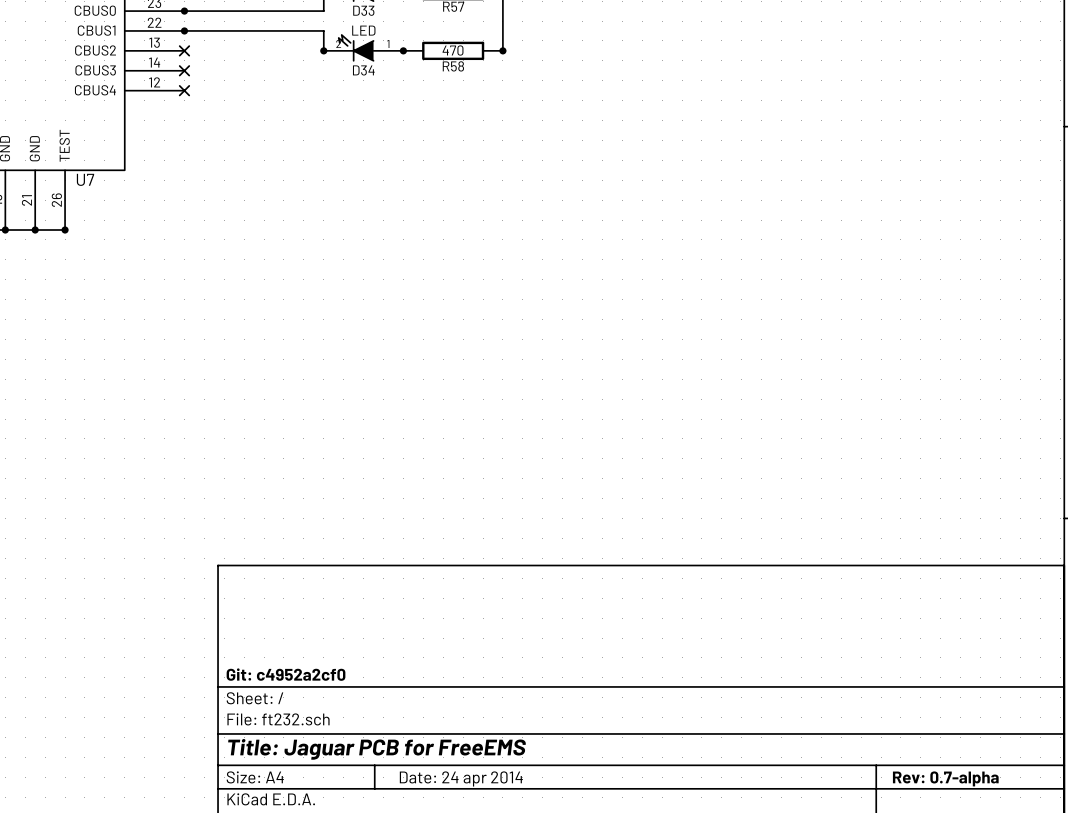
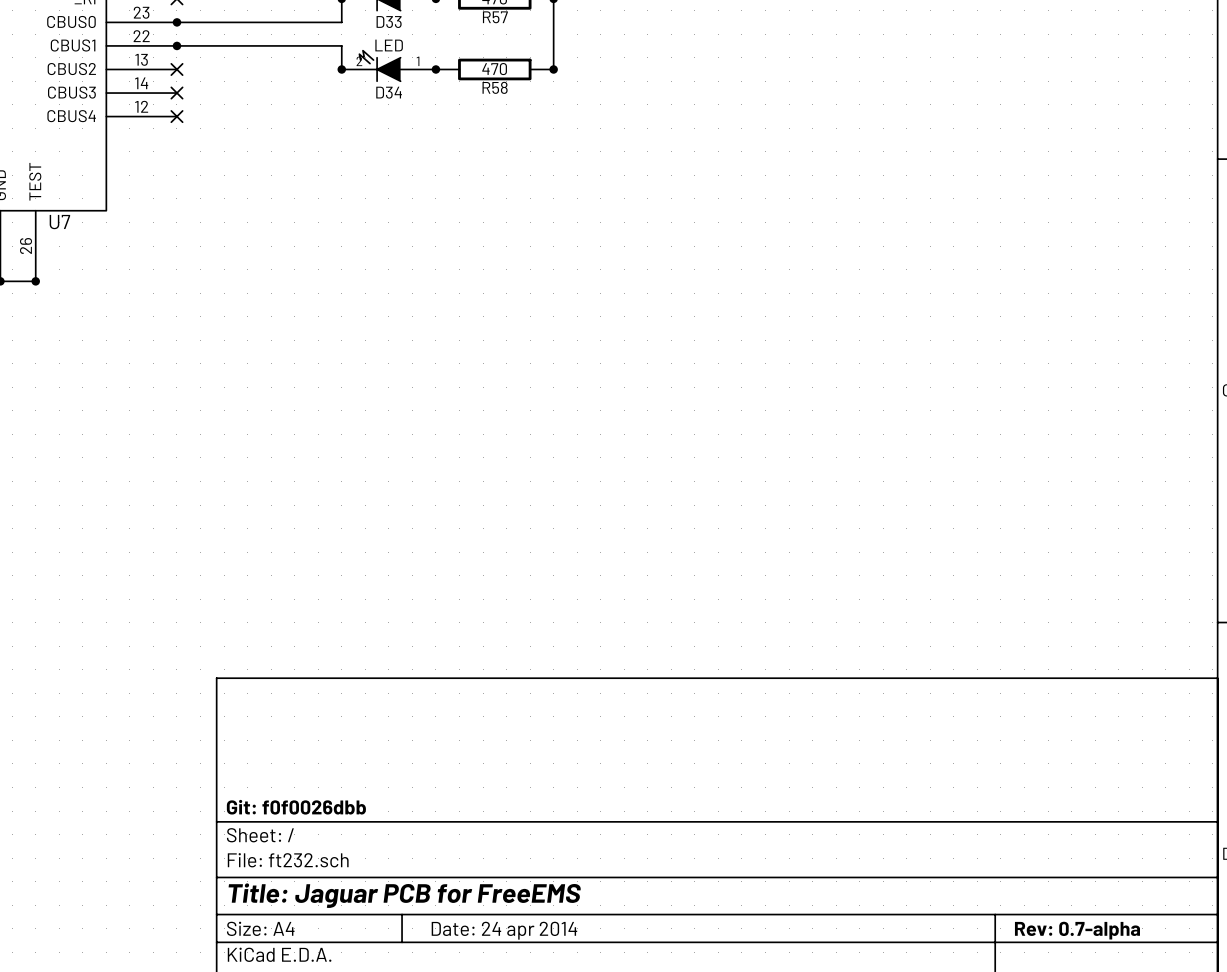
title block: Git: c4952a2cf0 (286, 674) -> Git: f0f0026dbb (296, 807)

